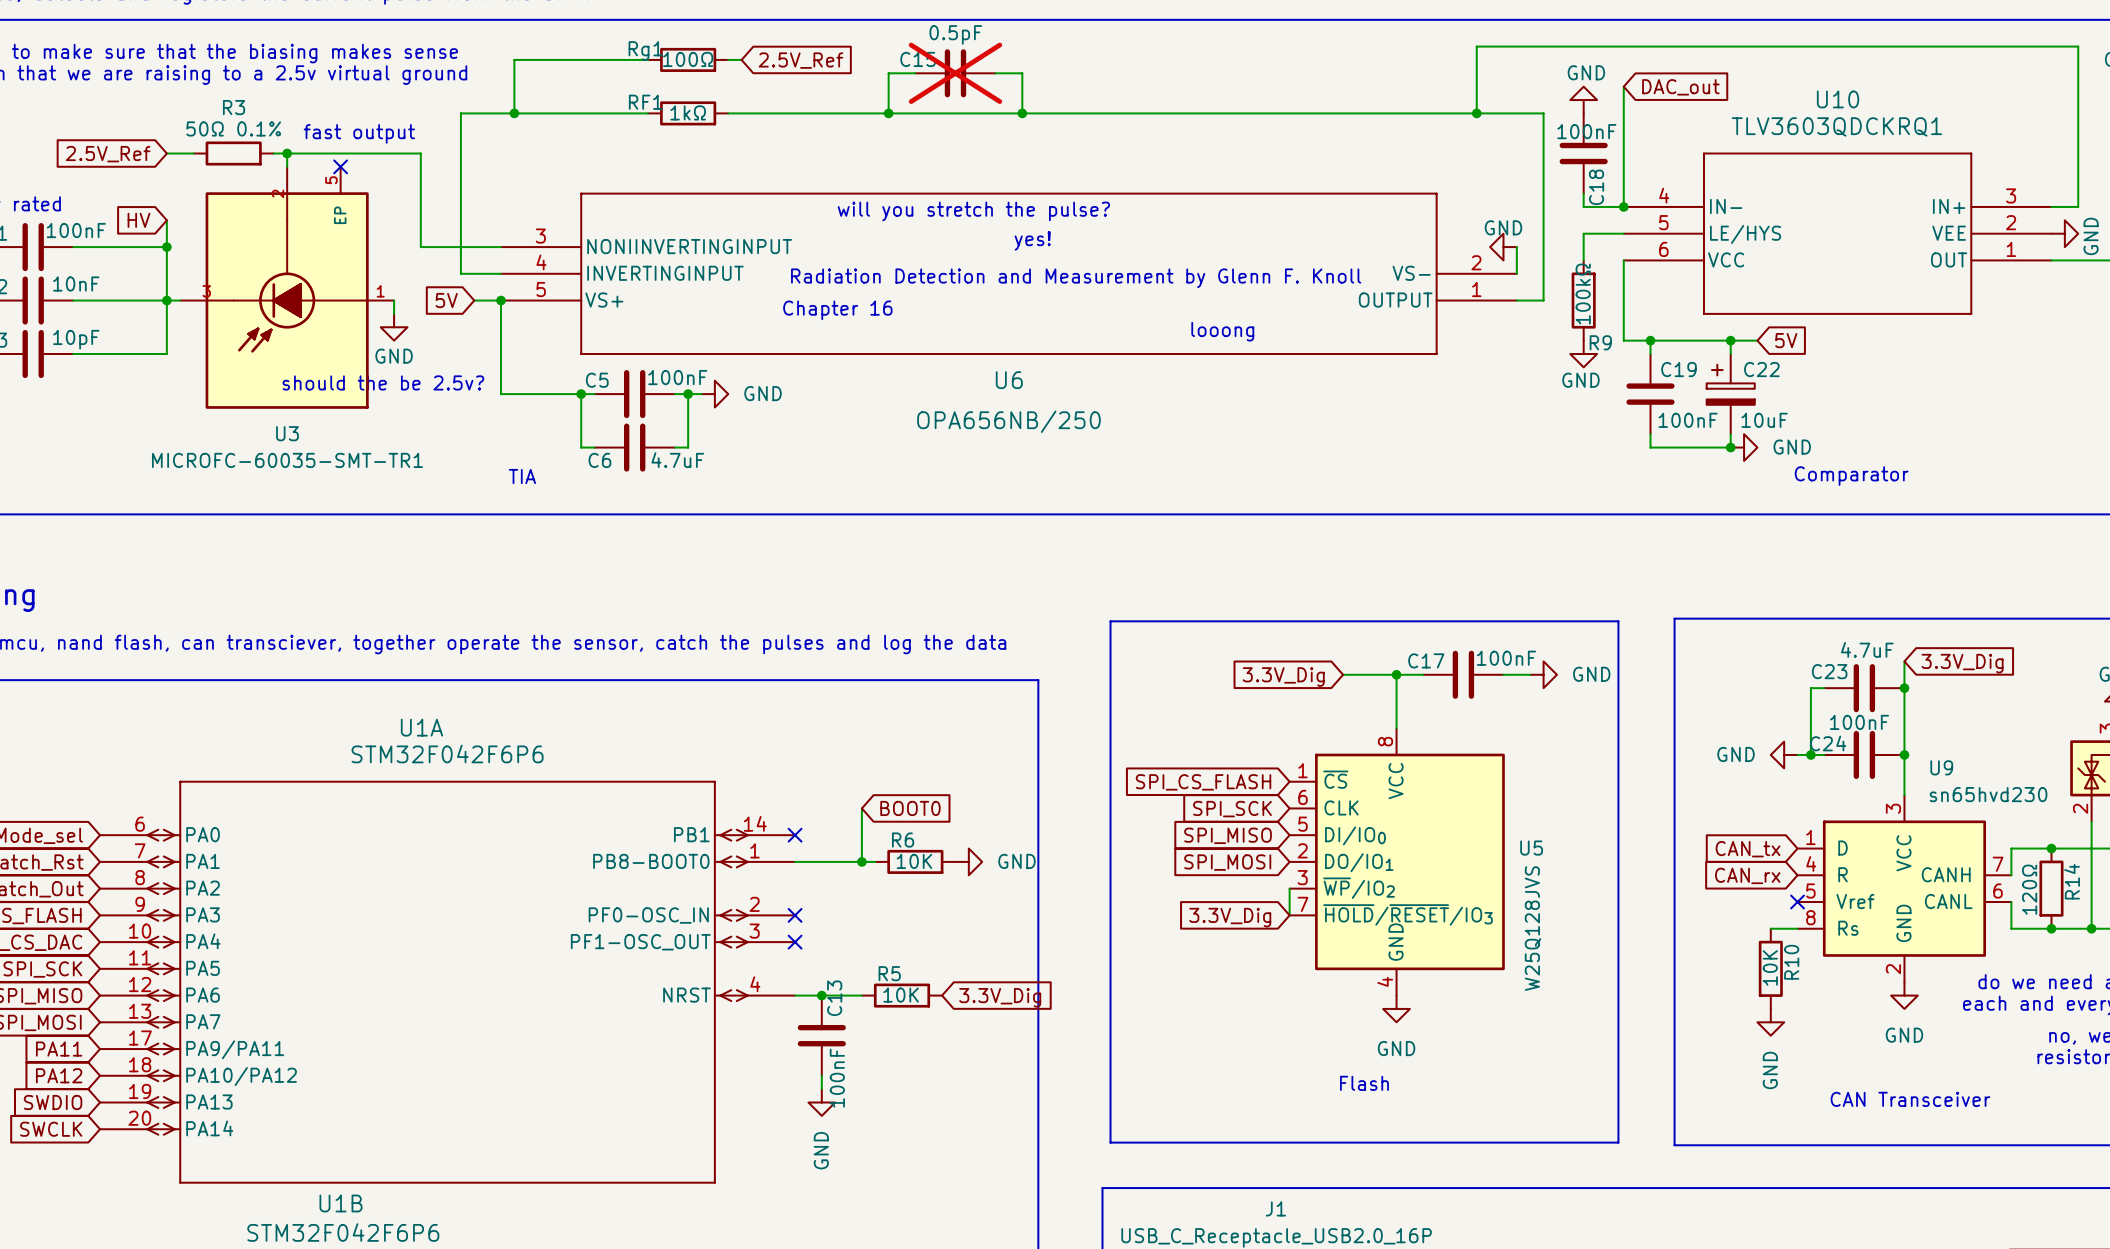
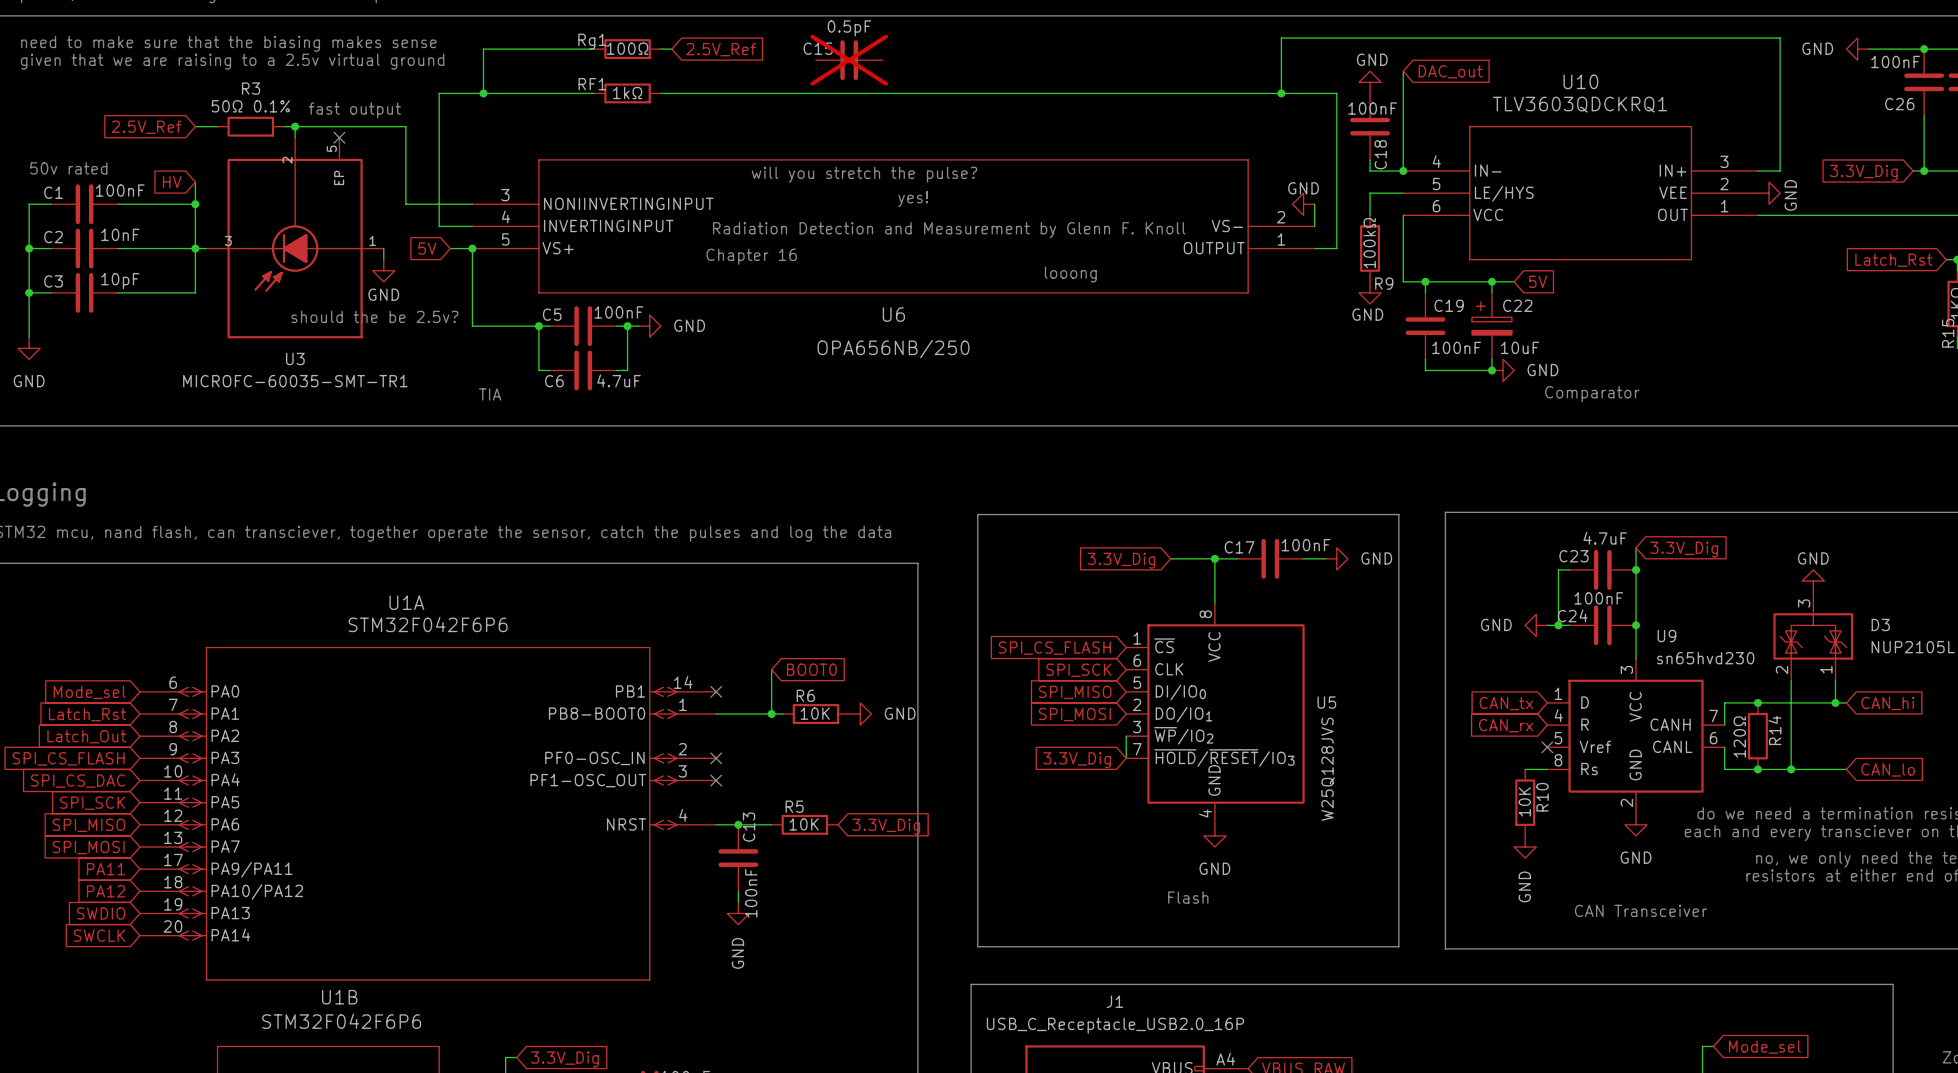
wire: (915, 73) (888, 73) (888, 113) -> none
wire: (995, 73) (1022, 73) (1022, 113) -> none
junction: (888, 113) -> none
junction: (1022, 113) -> none

